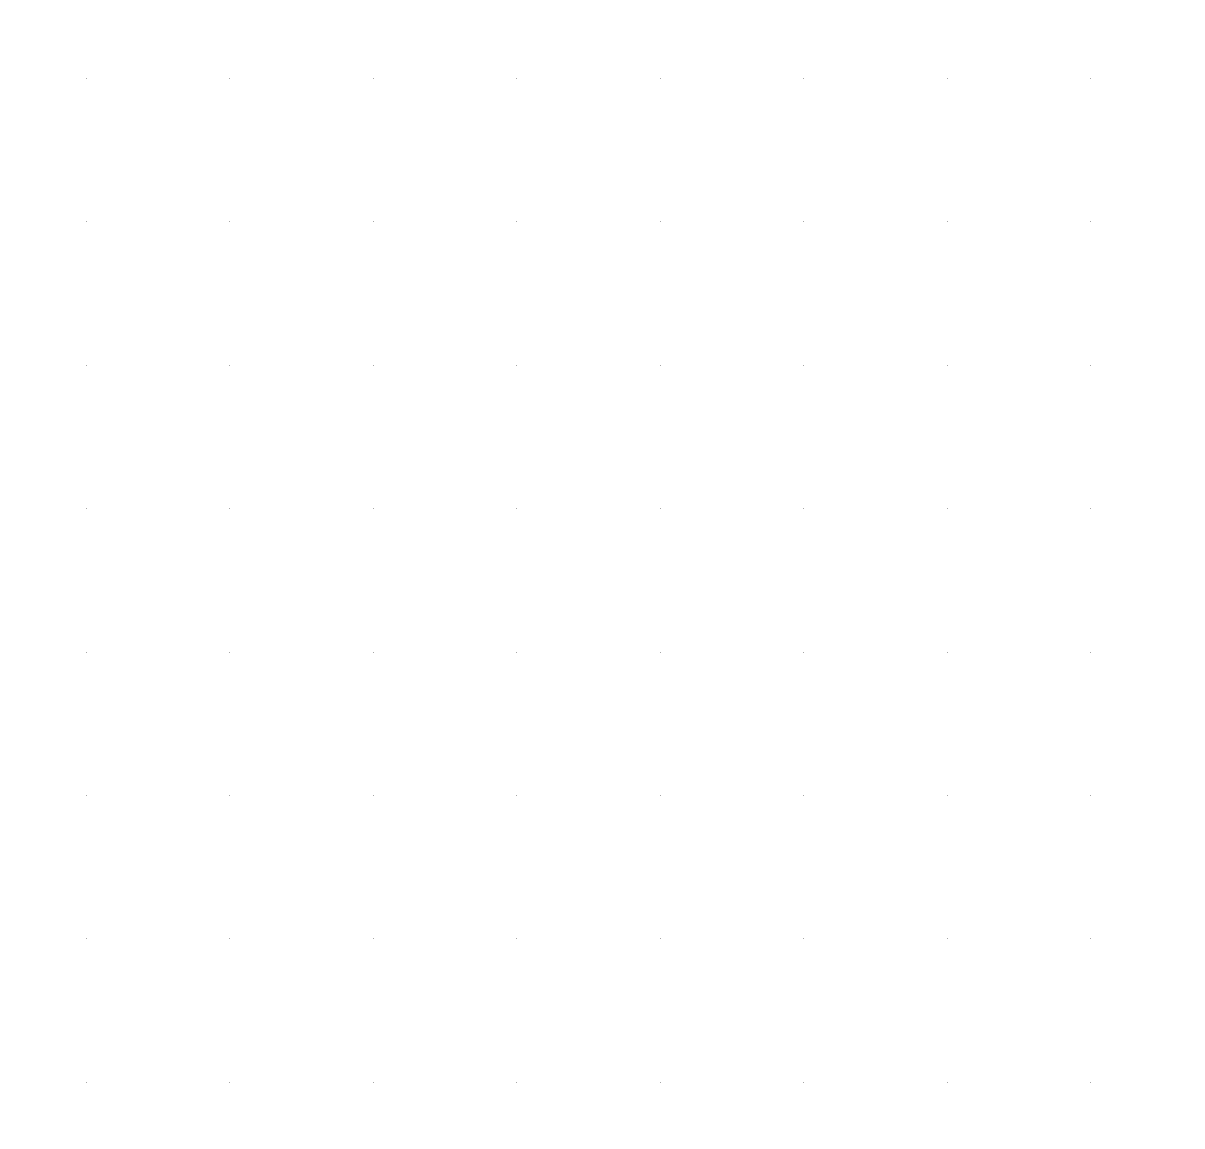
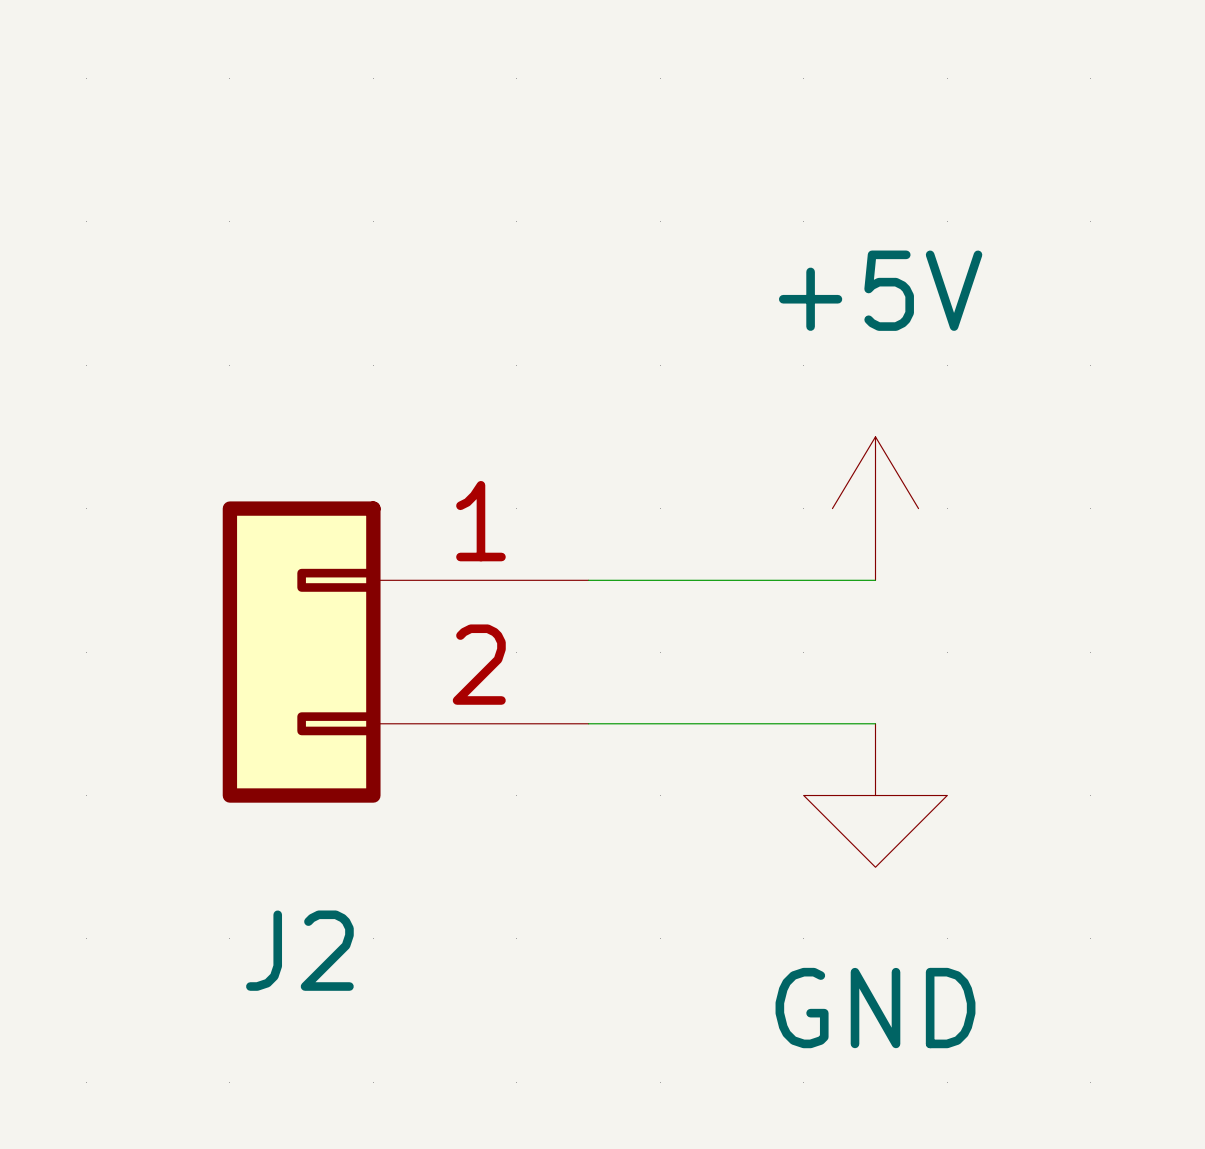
power symbol: none -> +5V (875, 508)
wire: none -> (588, 580) (875, 580)
J2: none -> (405, 652)
wire: none -> (588, 723) (875, 723)
power symbol: none -> GND (875, 795)

